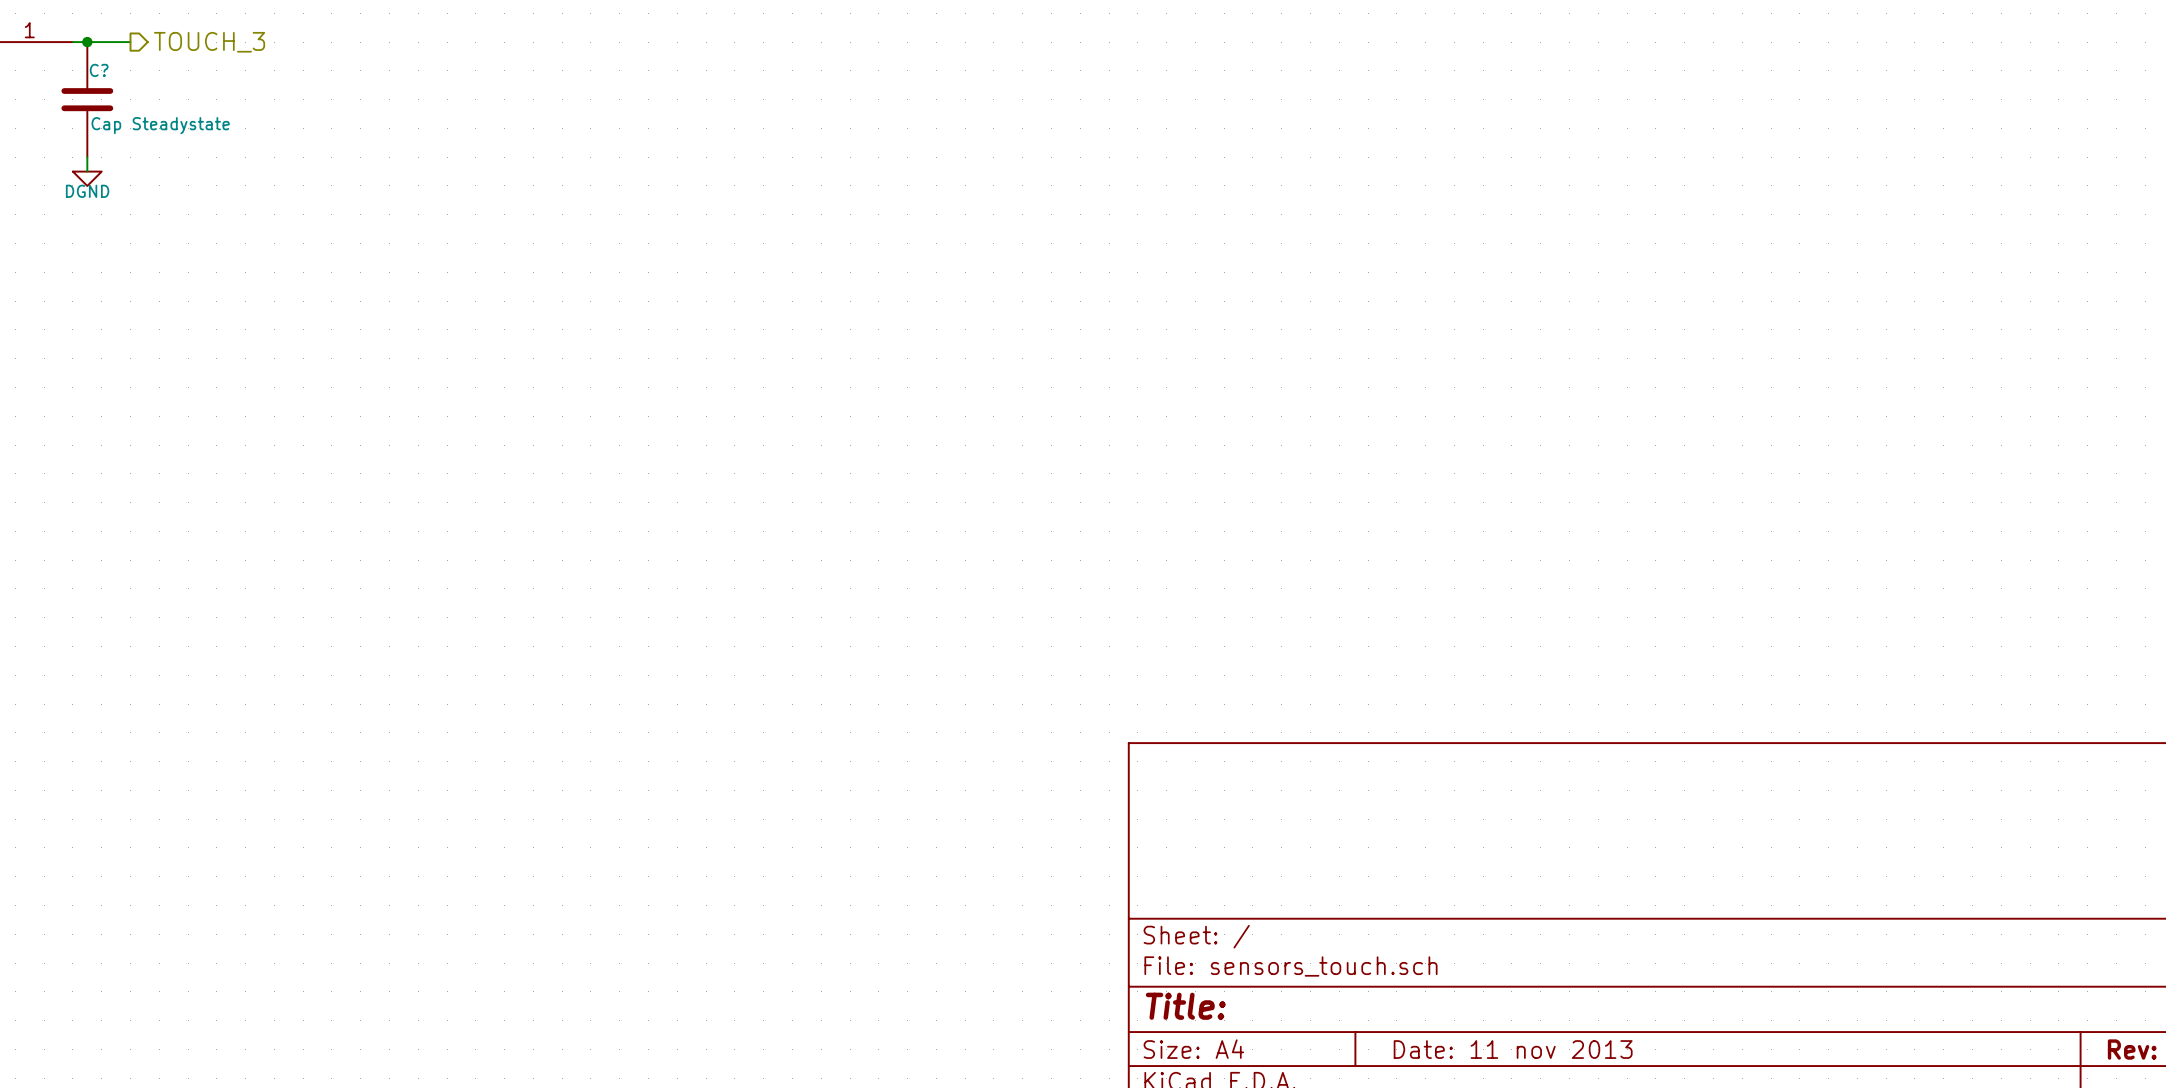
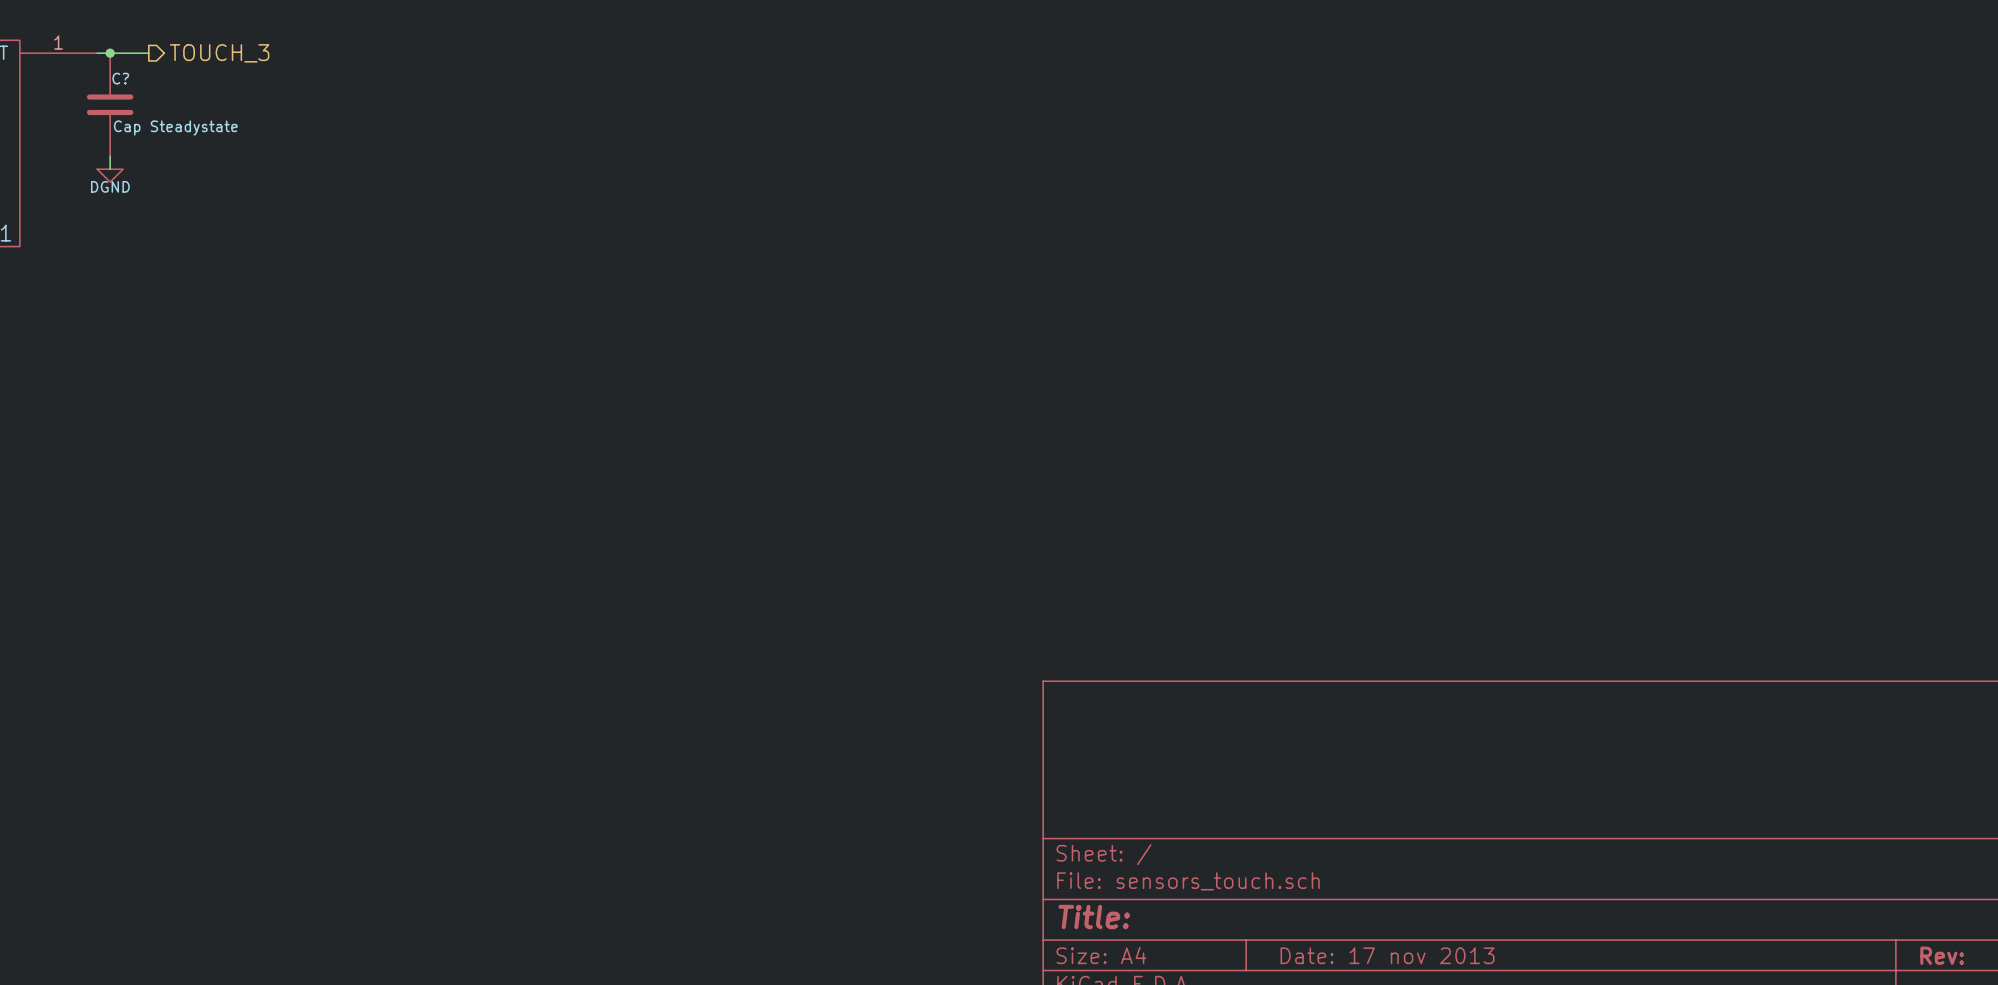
title block: Date: 11 nov 2013 (1513, 1049) -> Date: 17 nov 2013 (1387, 955)

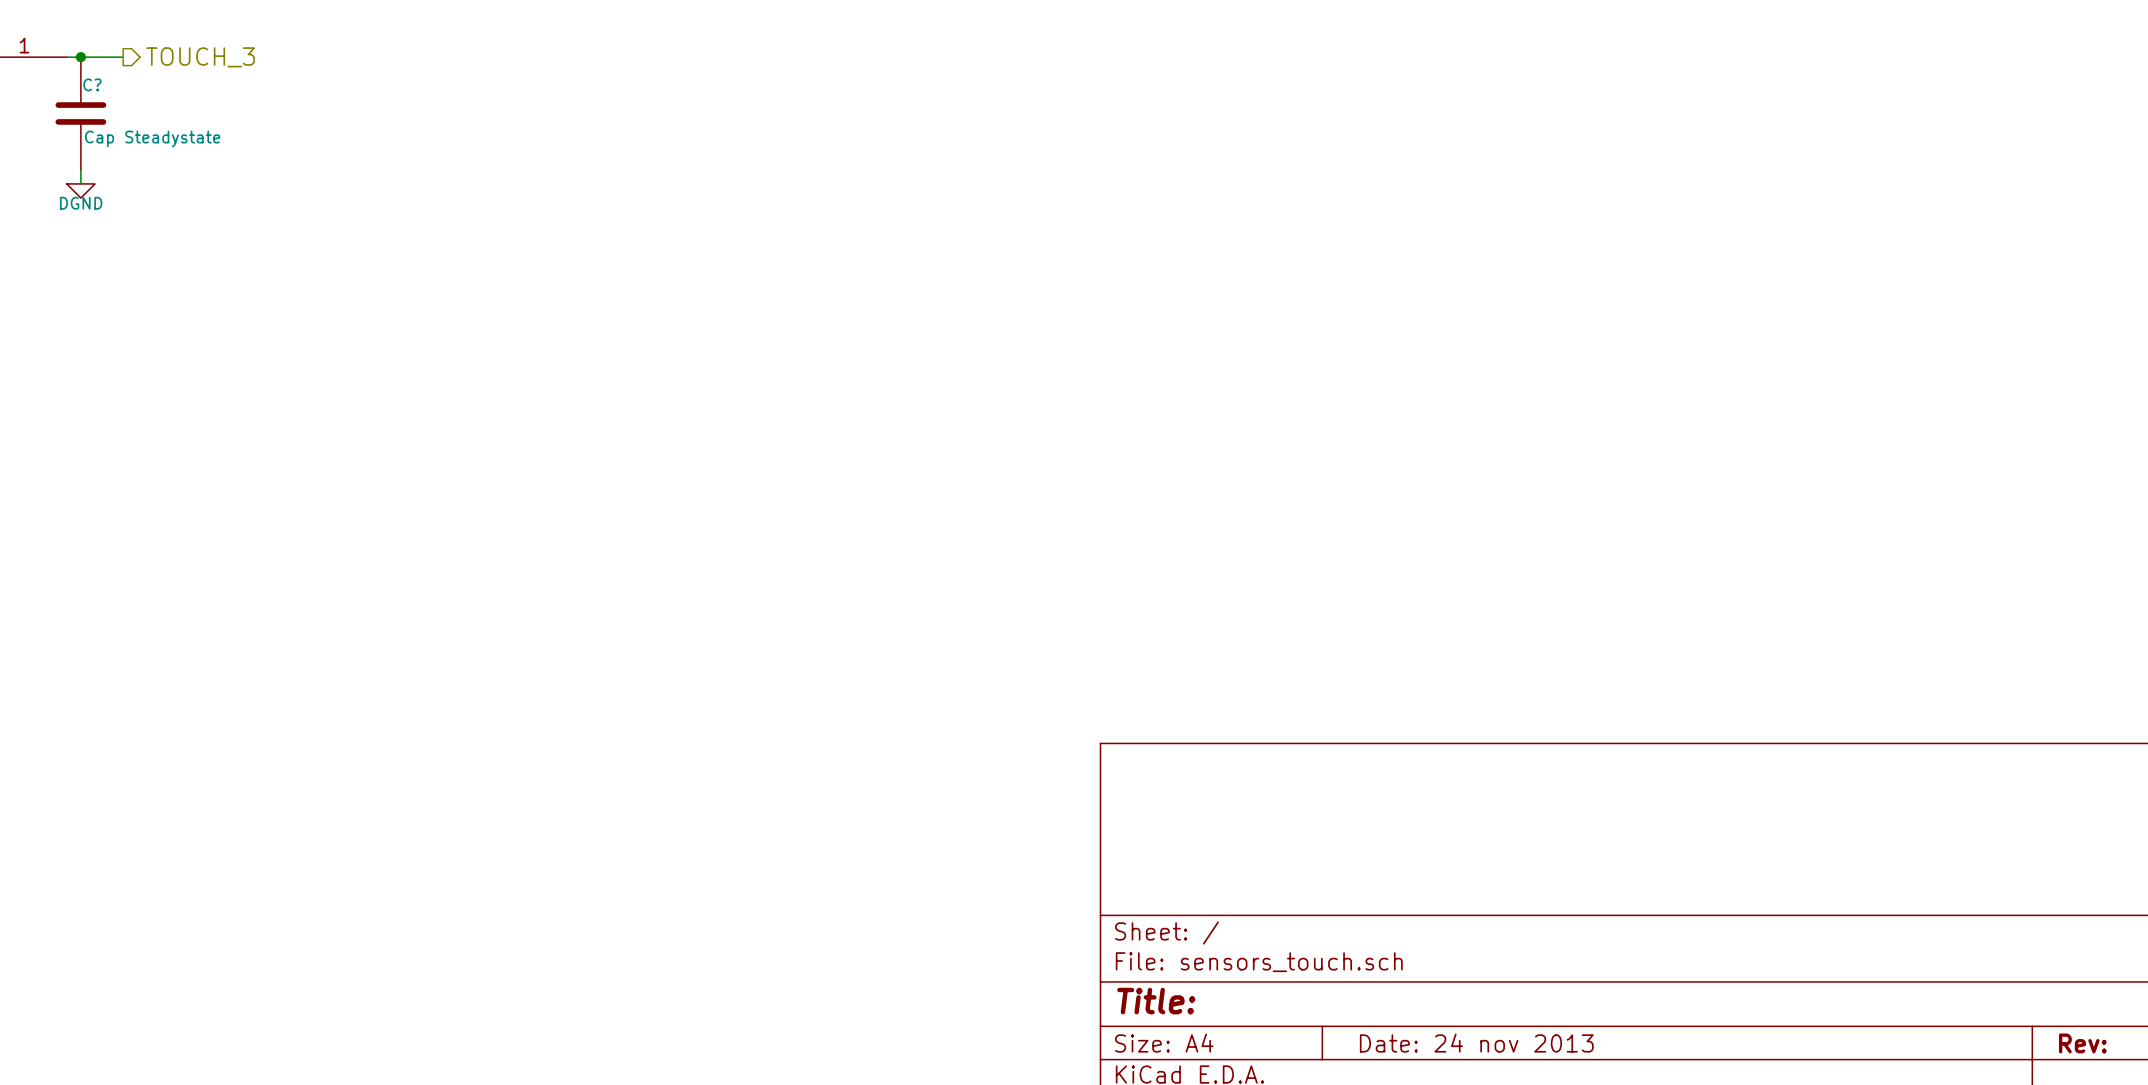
title block: Date: 17 nov 2013 (1387, 955) -> Date: 24 nov 2013 (1476, 1043)

